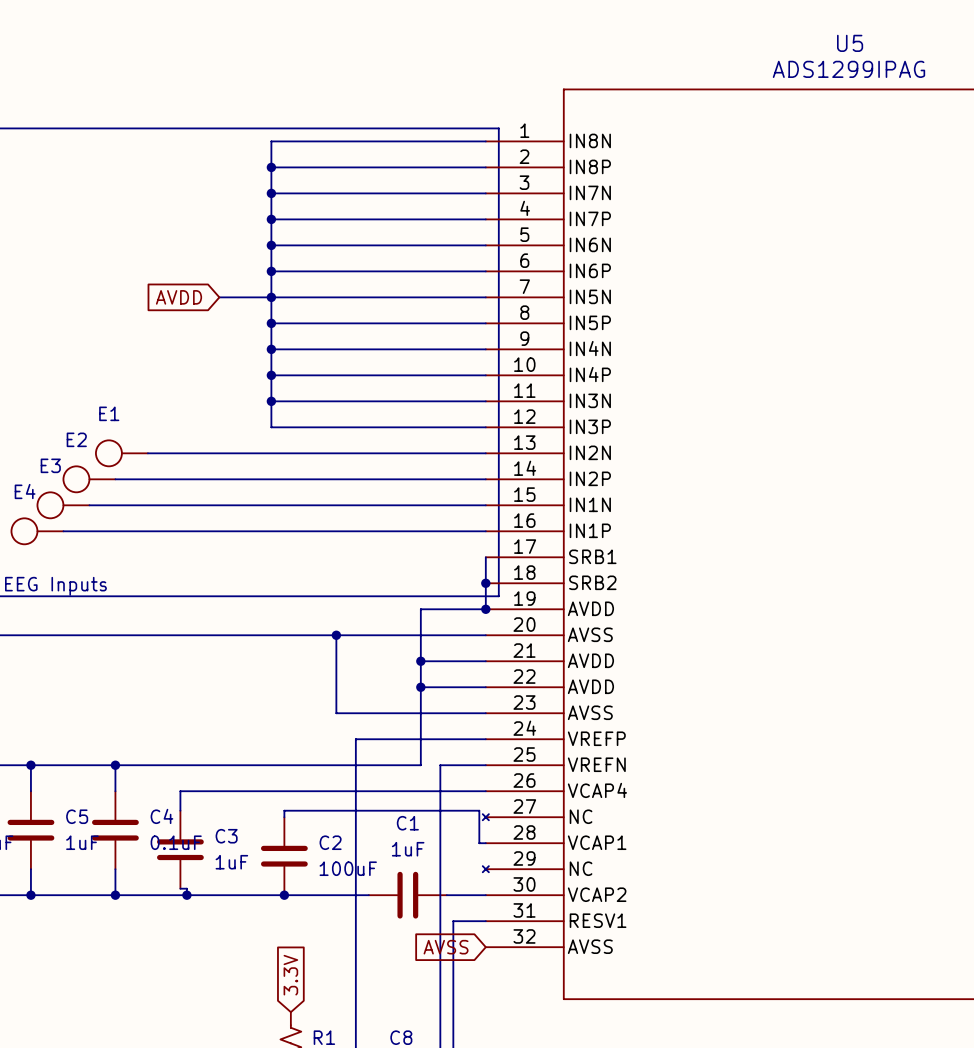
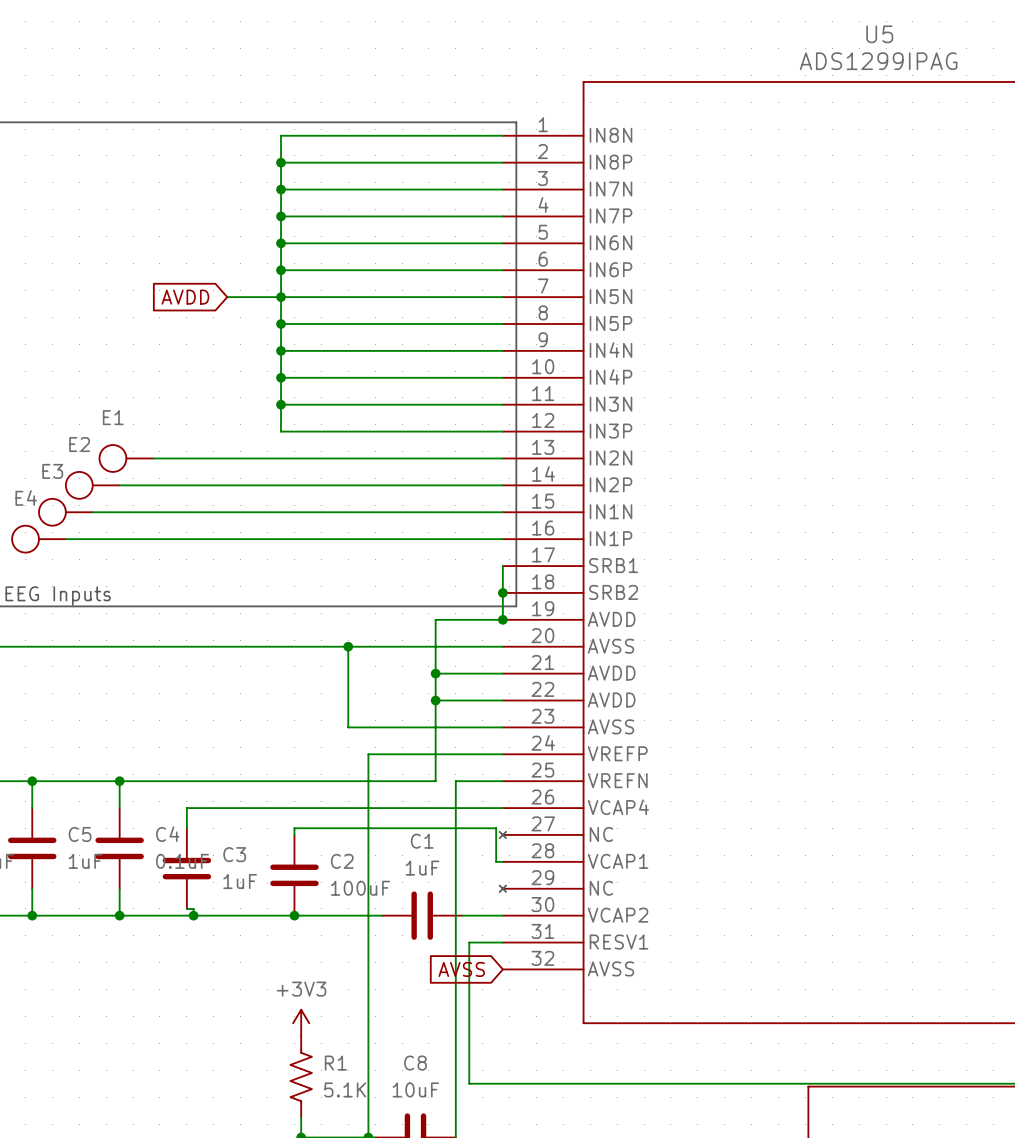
global label: 3.3V (290, 975) -> none
power symbol: none -> +3V3 (301, 1023)

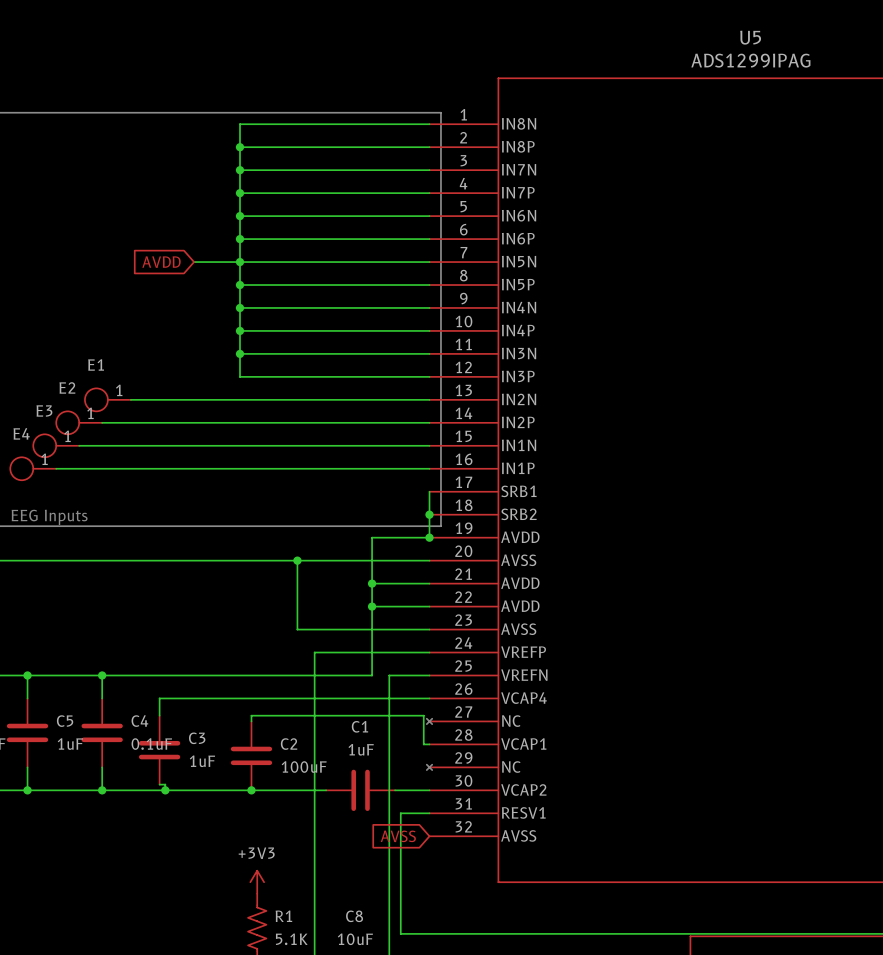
E1 pin number: none -> 1 (119, 390)
E2 pin number: none -> 1 (90, 413)
E3 pin number: none -> 1 (67, 436)
E4 pin number: none -> 1 (44, 459)

